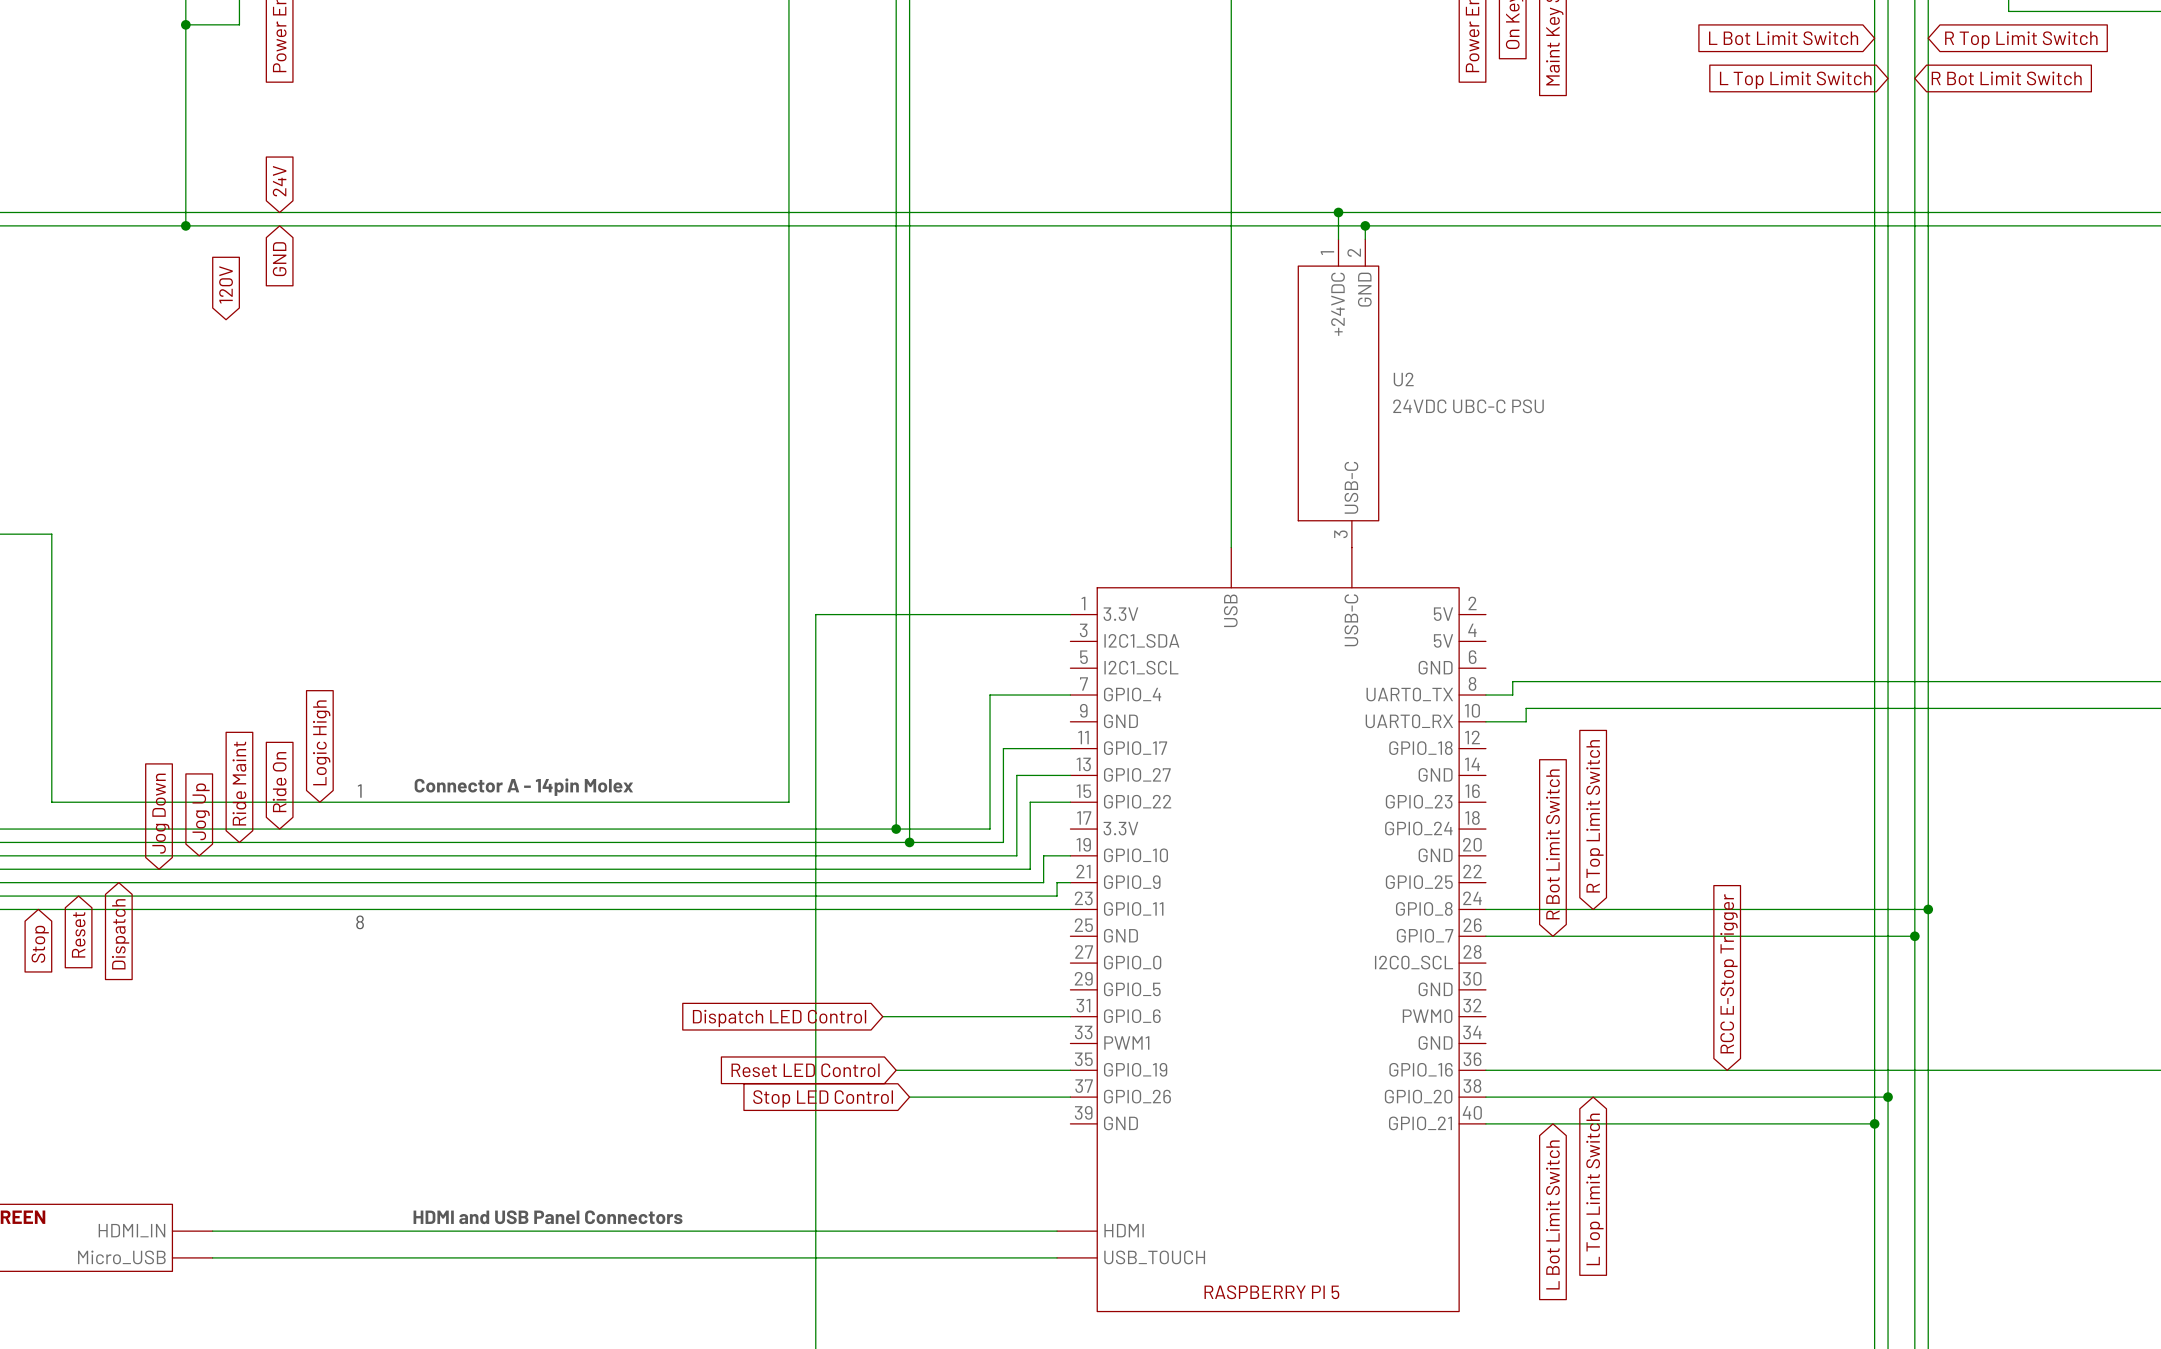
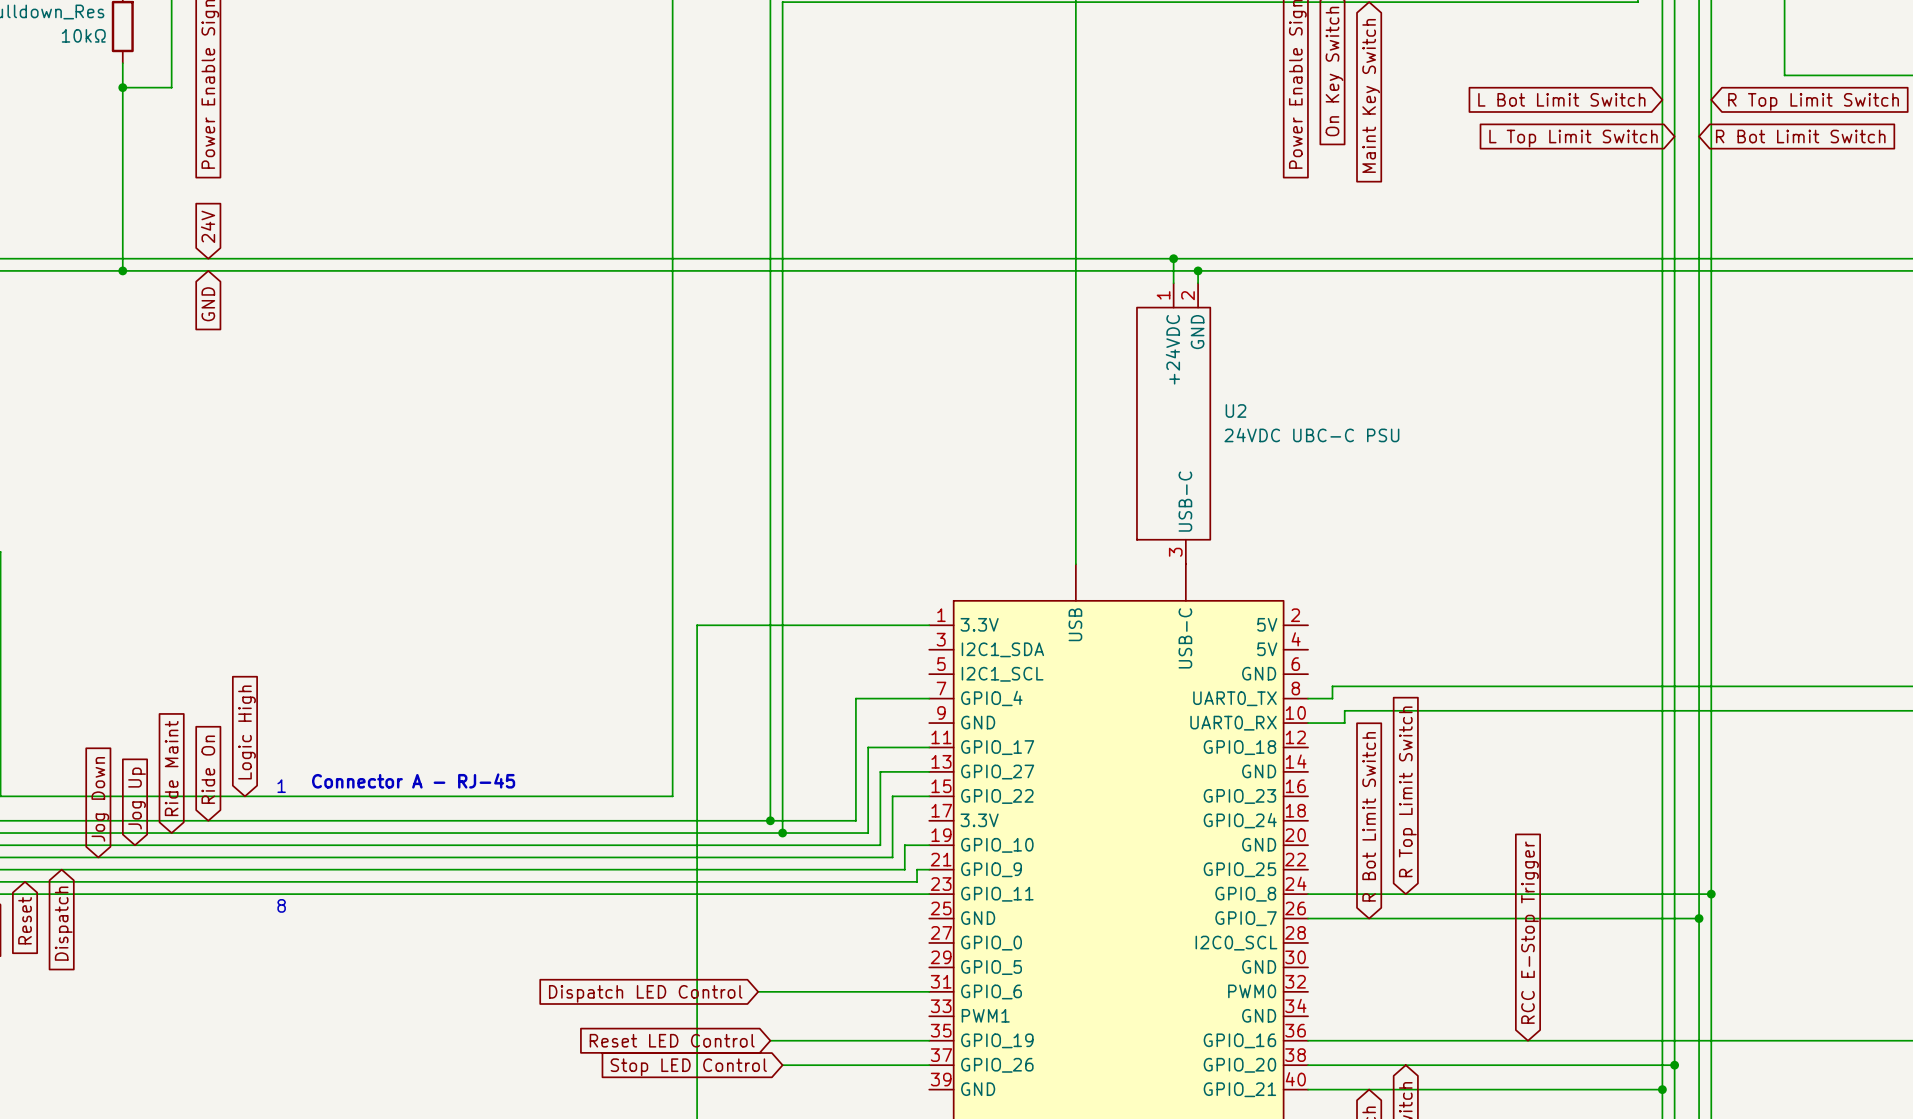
global label: 120V (226, 284) -> none
text: Connector A - 14pin Molex (523, 787) -> Connector A - RJ-45 (413, 780)

